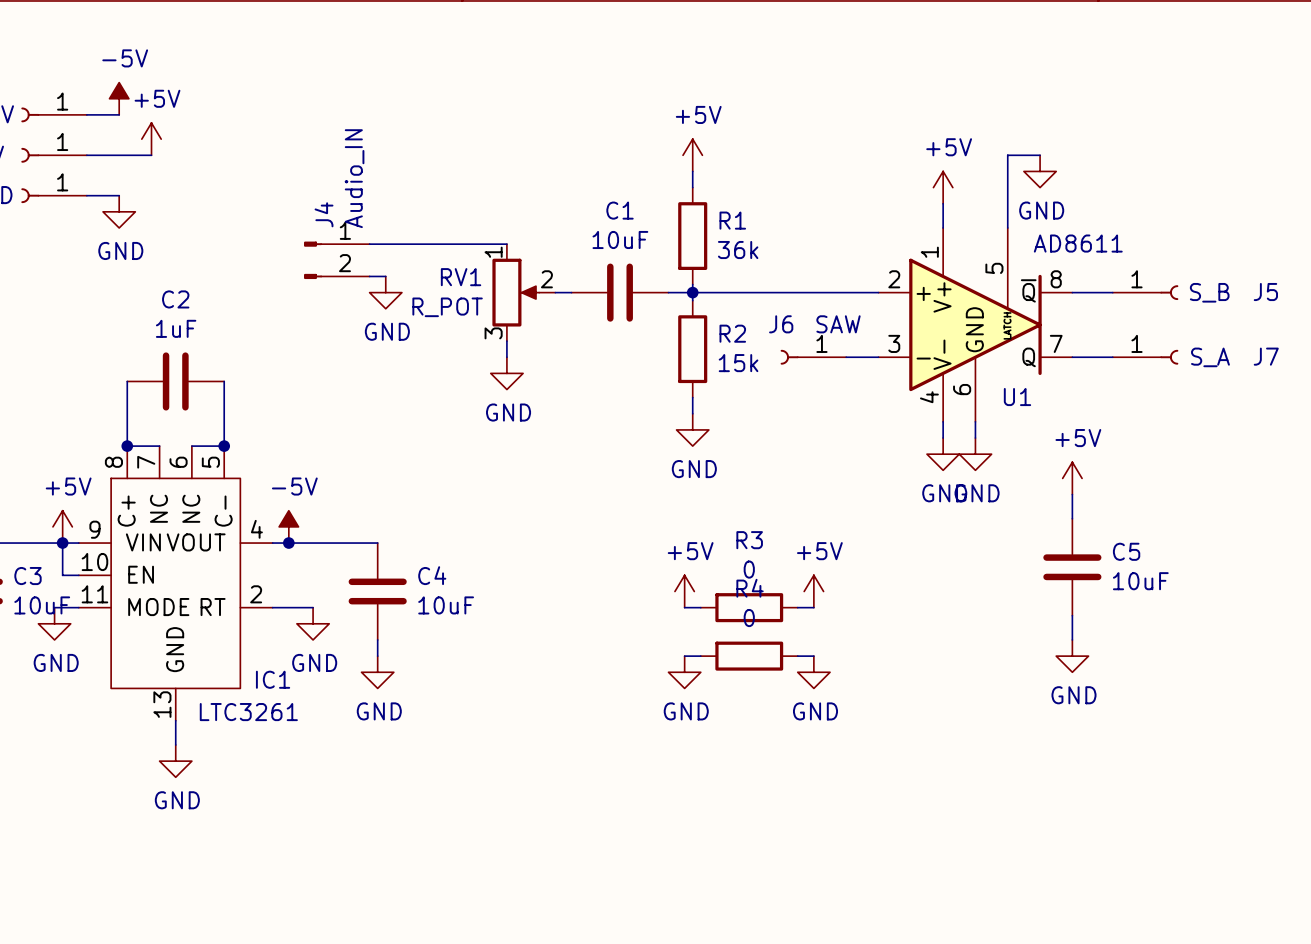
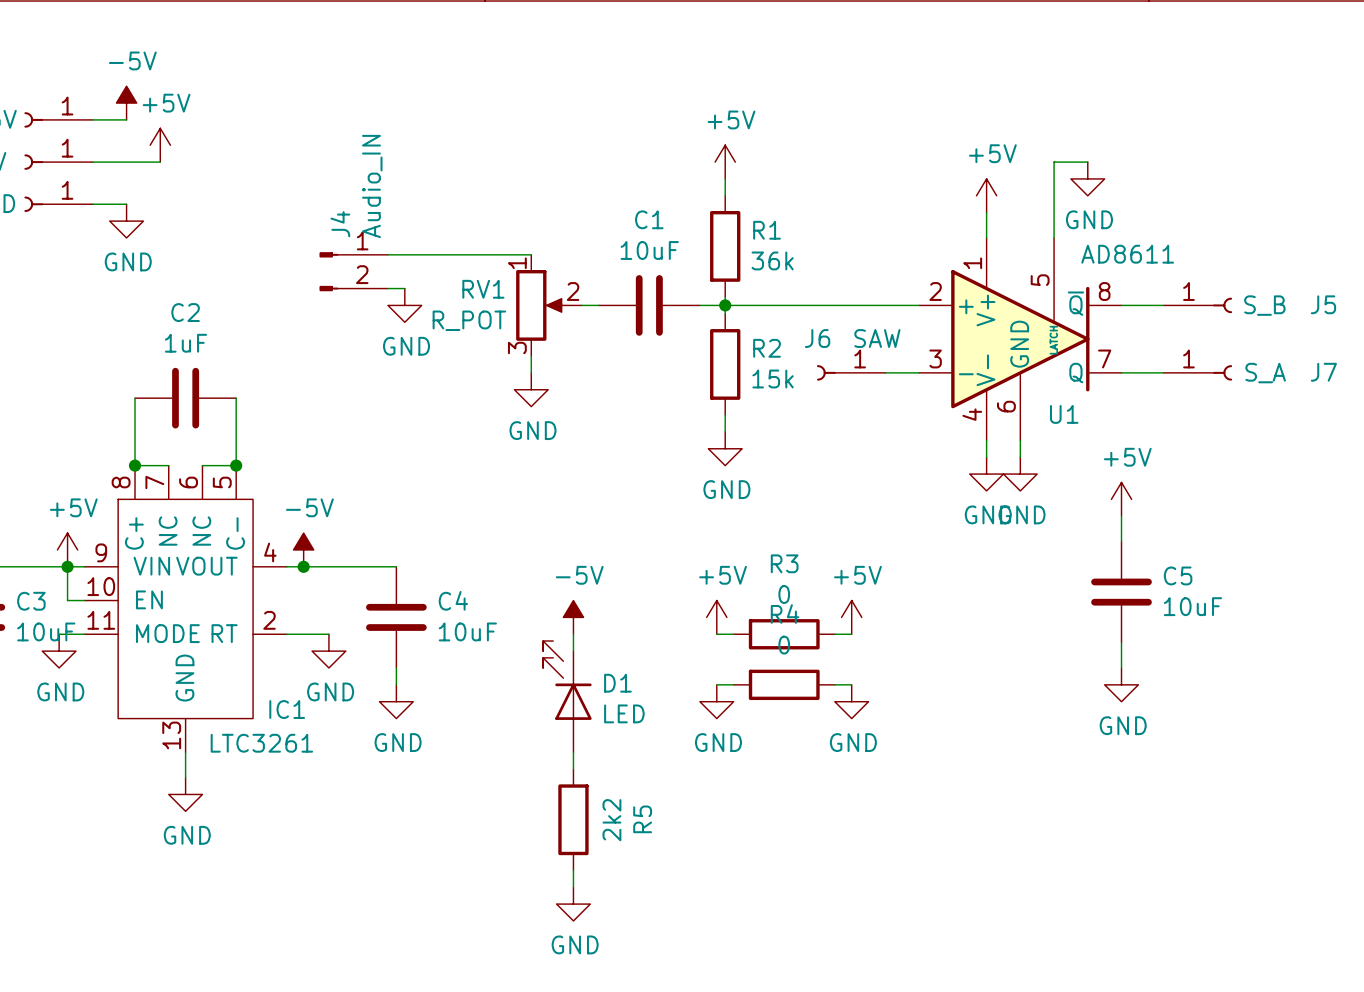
power symbol: none -> -5V (573, 617)
wire: none -> (573, 634) (573, 651)
D1: none -> LED (567, 696)
wire: none -> (573, 752) (573, 769)
R5: none -> 2k2 (573, 819)
wire: none -> (573, 870) (573, 887)
power symbol: none -> GND (573, 904)

